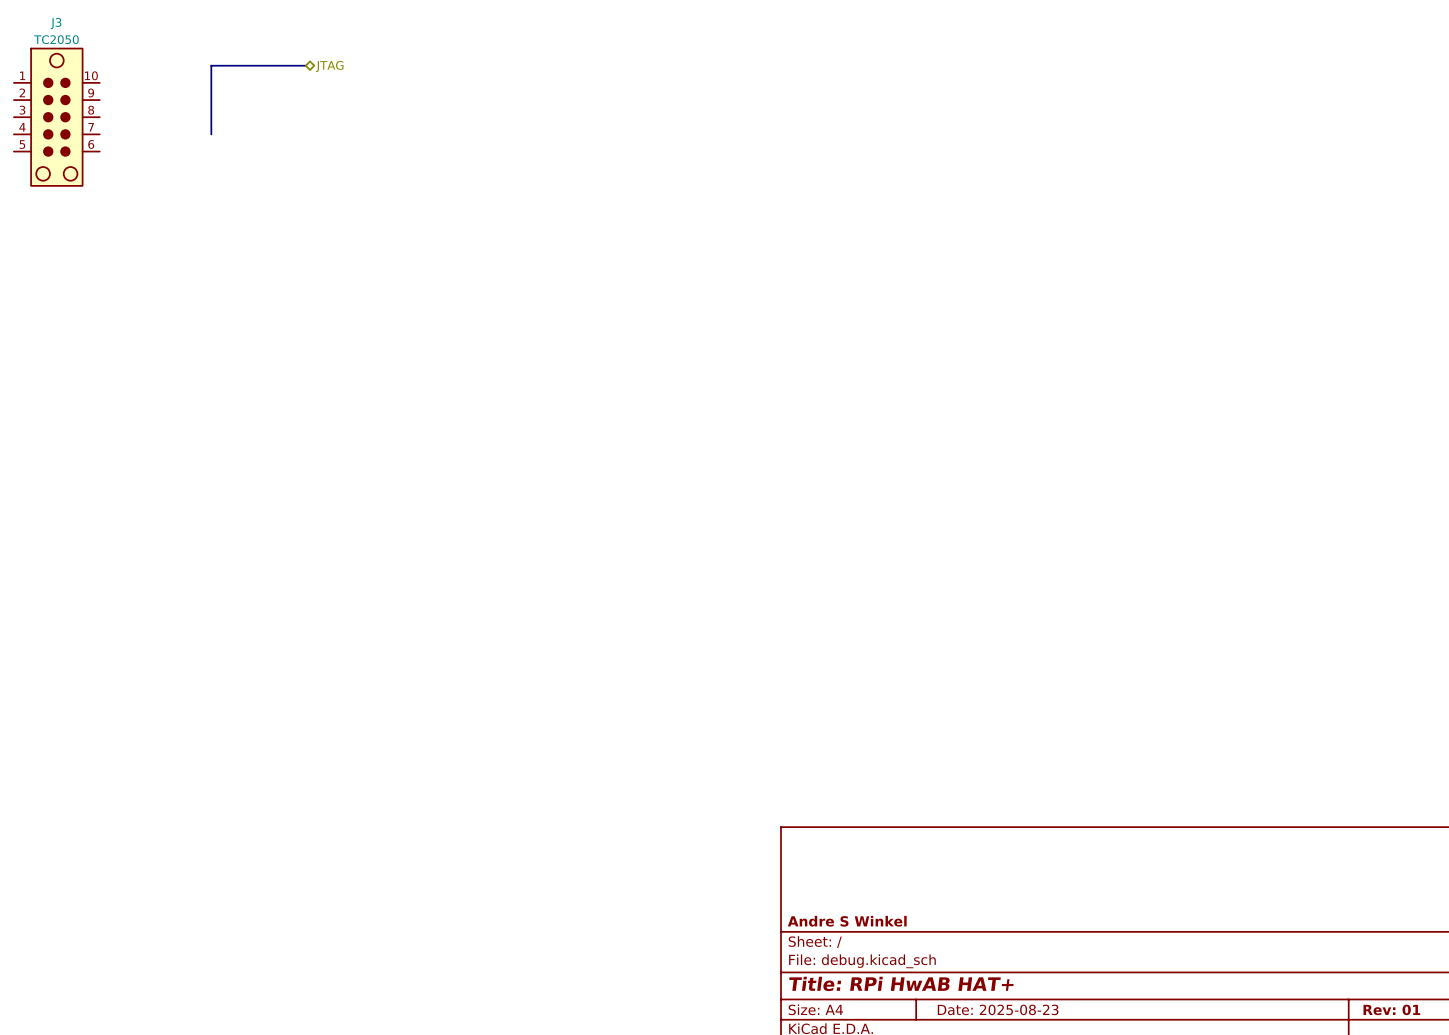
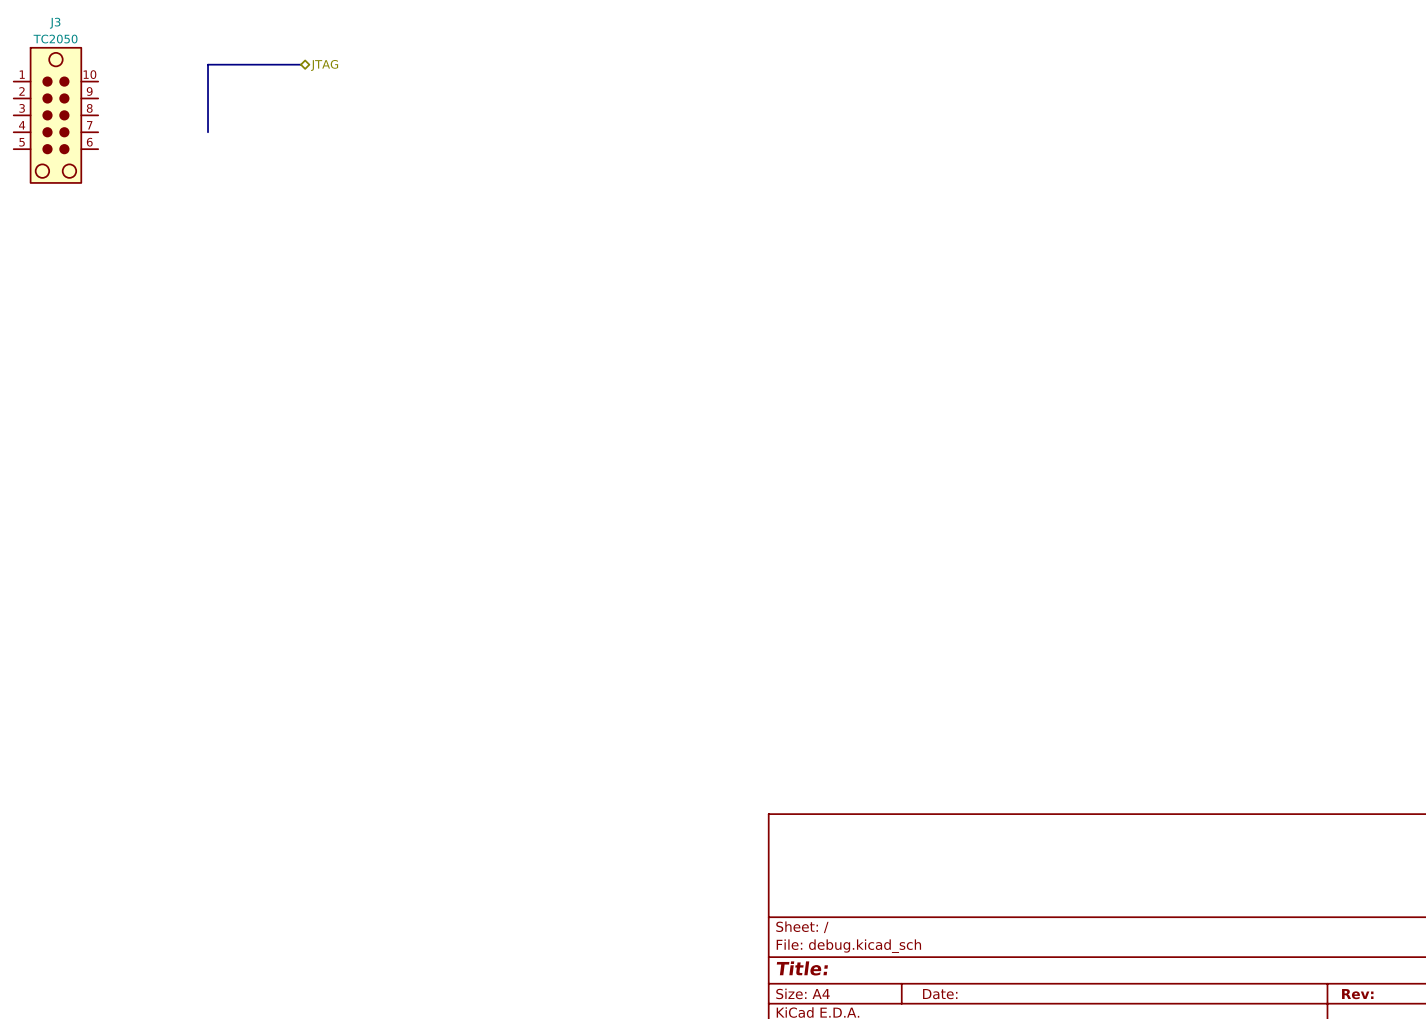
title block: Andre S Winkel (847, 921) -> none
title block: Title: RPi HwAB HAT+ (901, 983) -> Title: (802, 968)
title block: Date: 2025-08-23 (998, 1009) -> Date: (940, 994)
title block: Rev: 01 (1391, 1009) -> Rev: (1357, 994)

